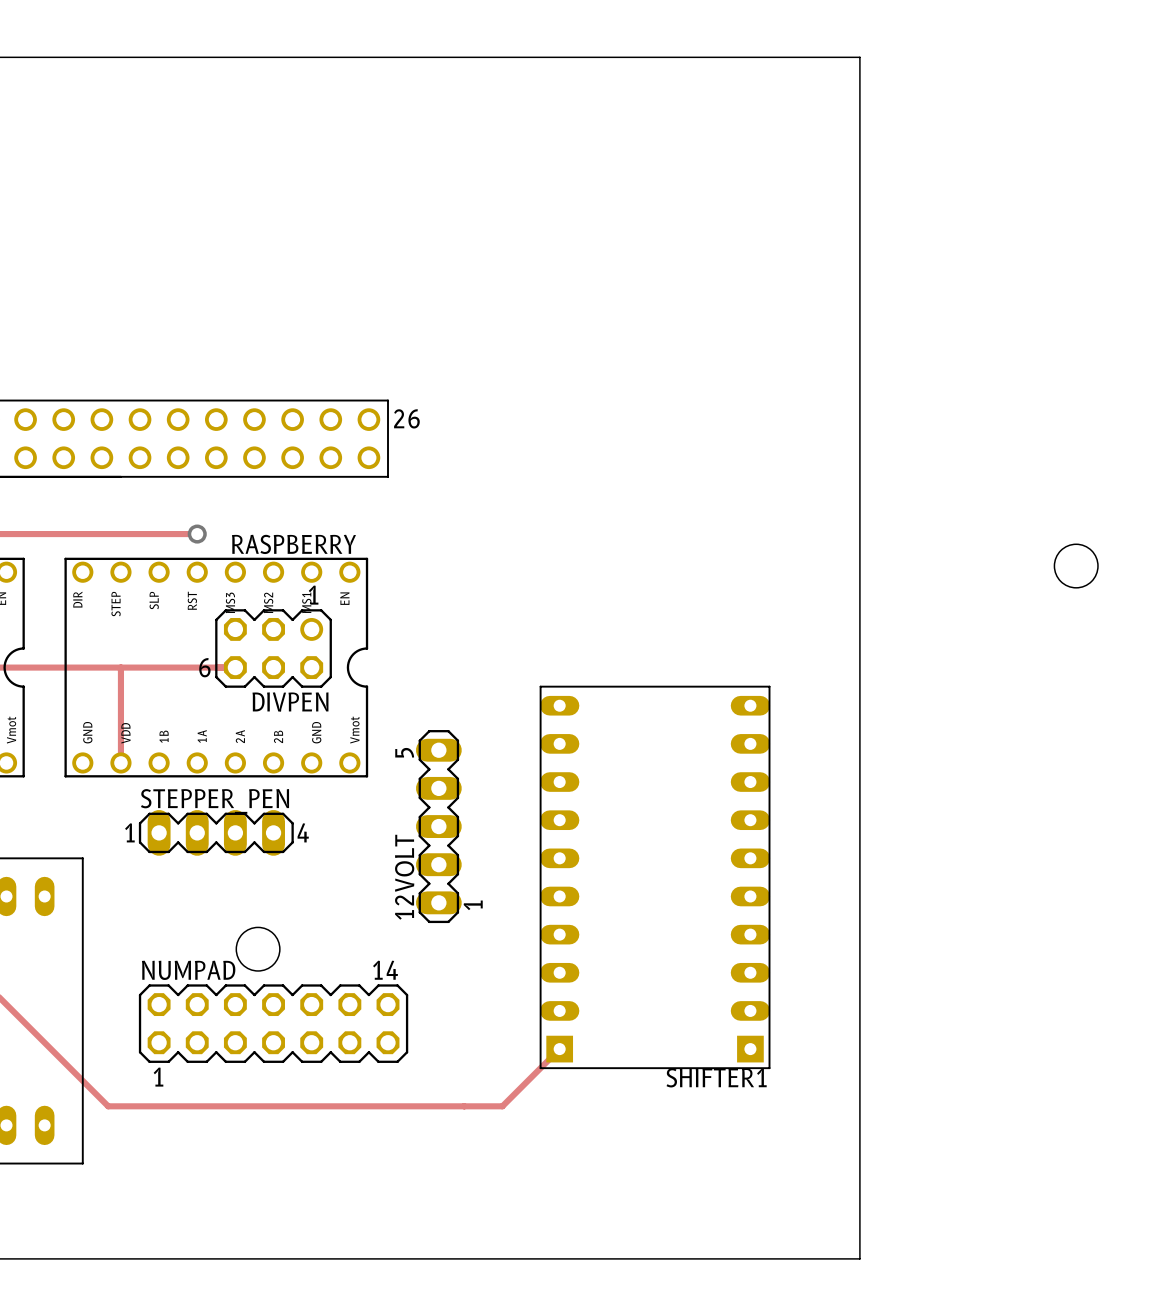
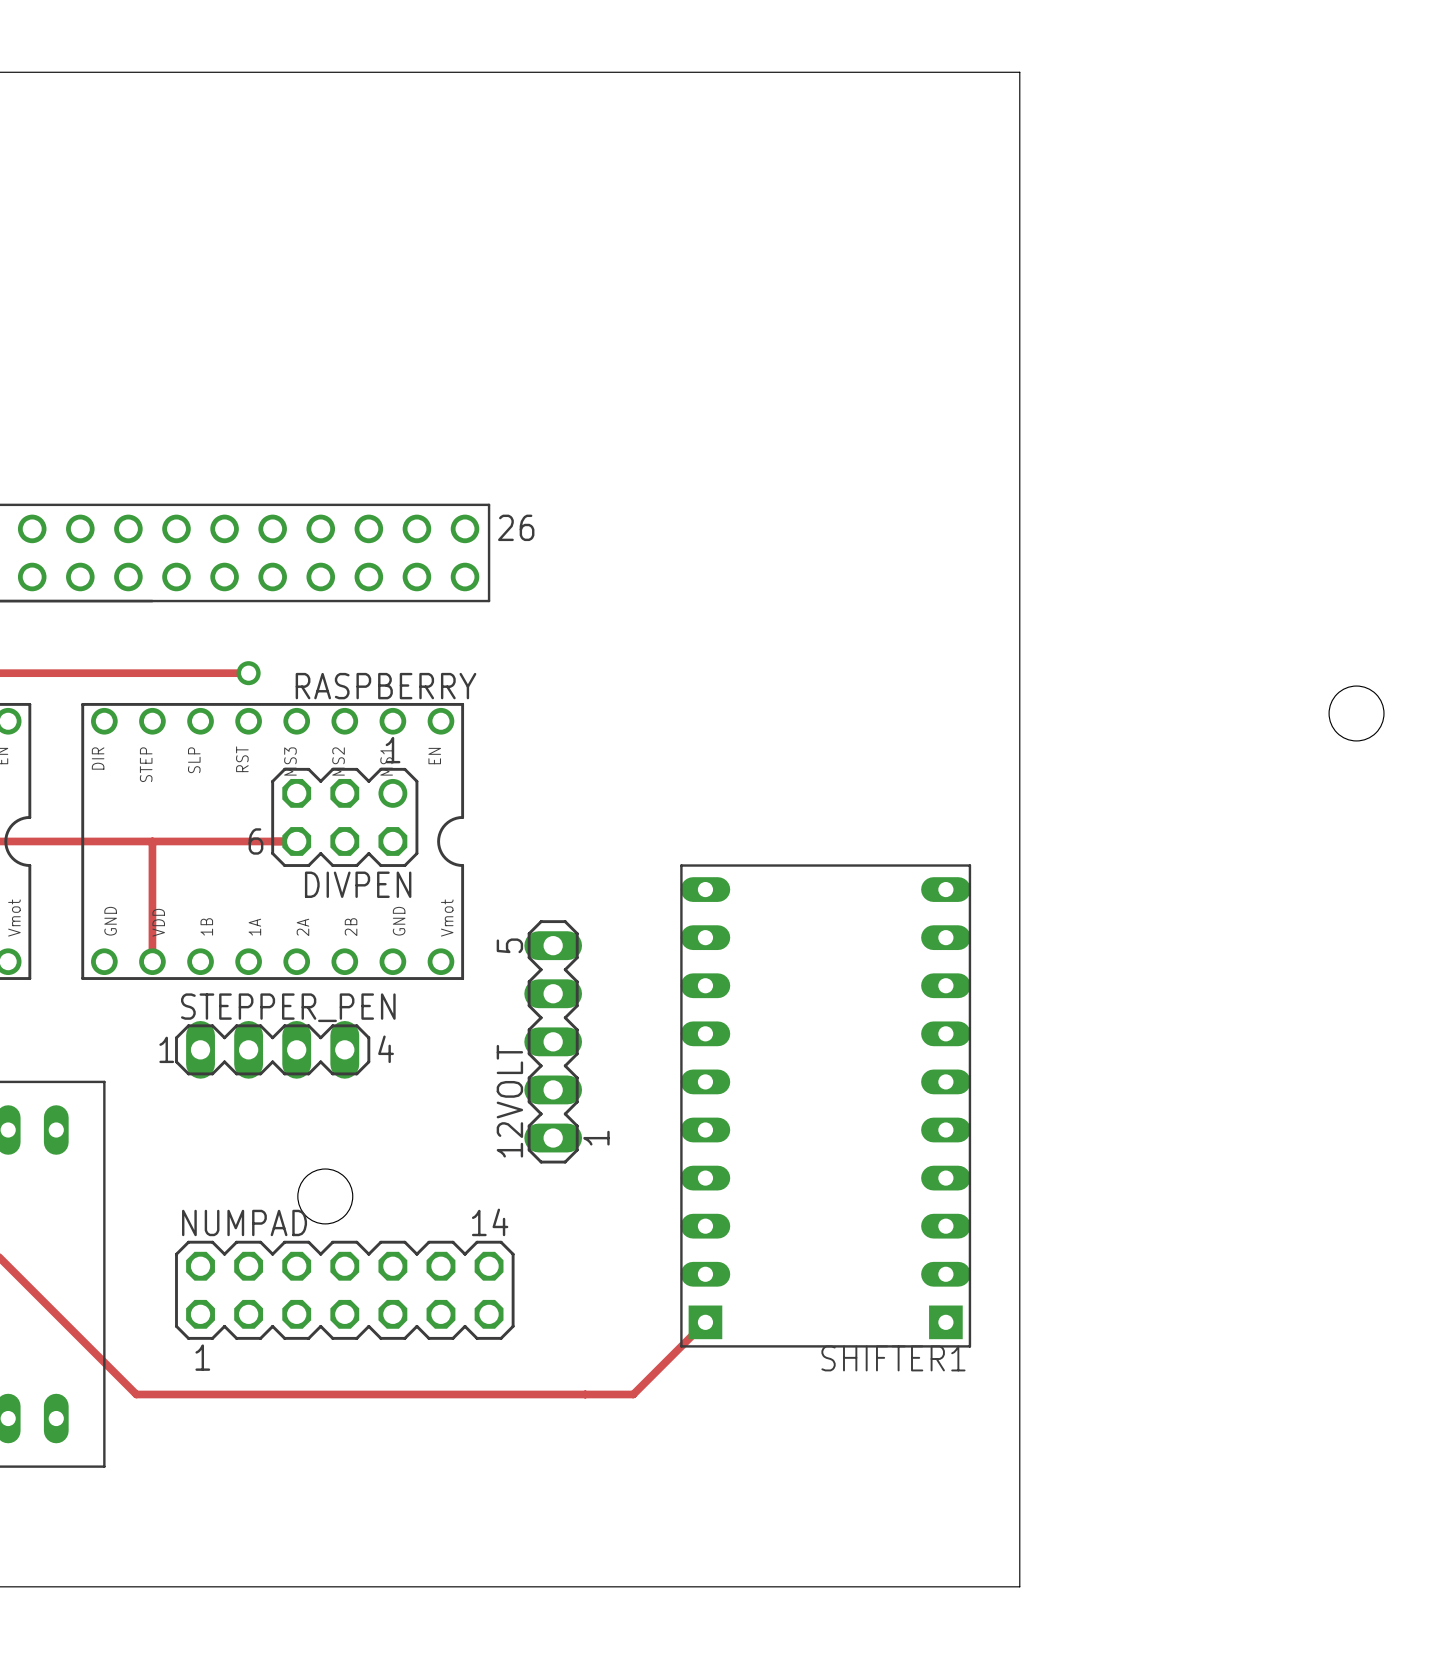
board edge: (809, 57) (859, 57) (859, 1258) (809, 1258) -> (1019, 72) (1019, 1586)

